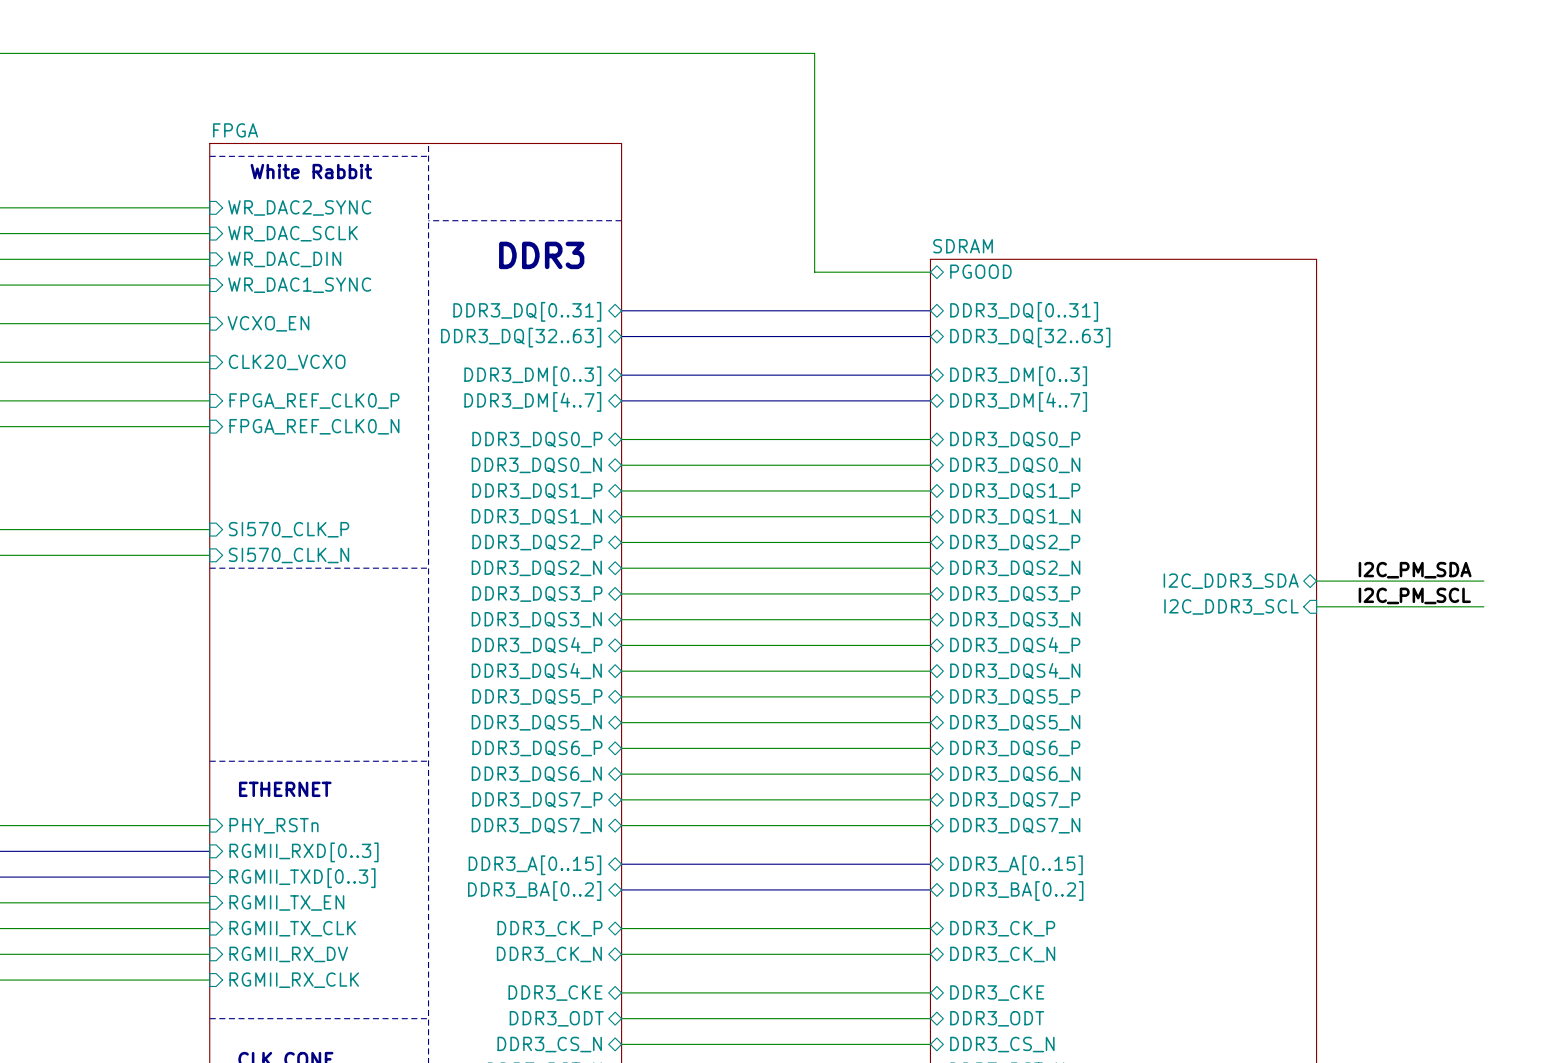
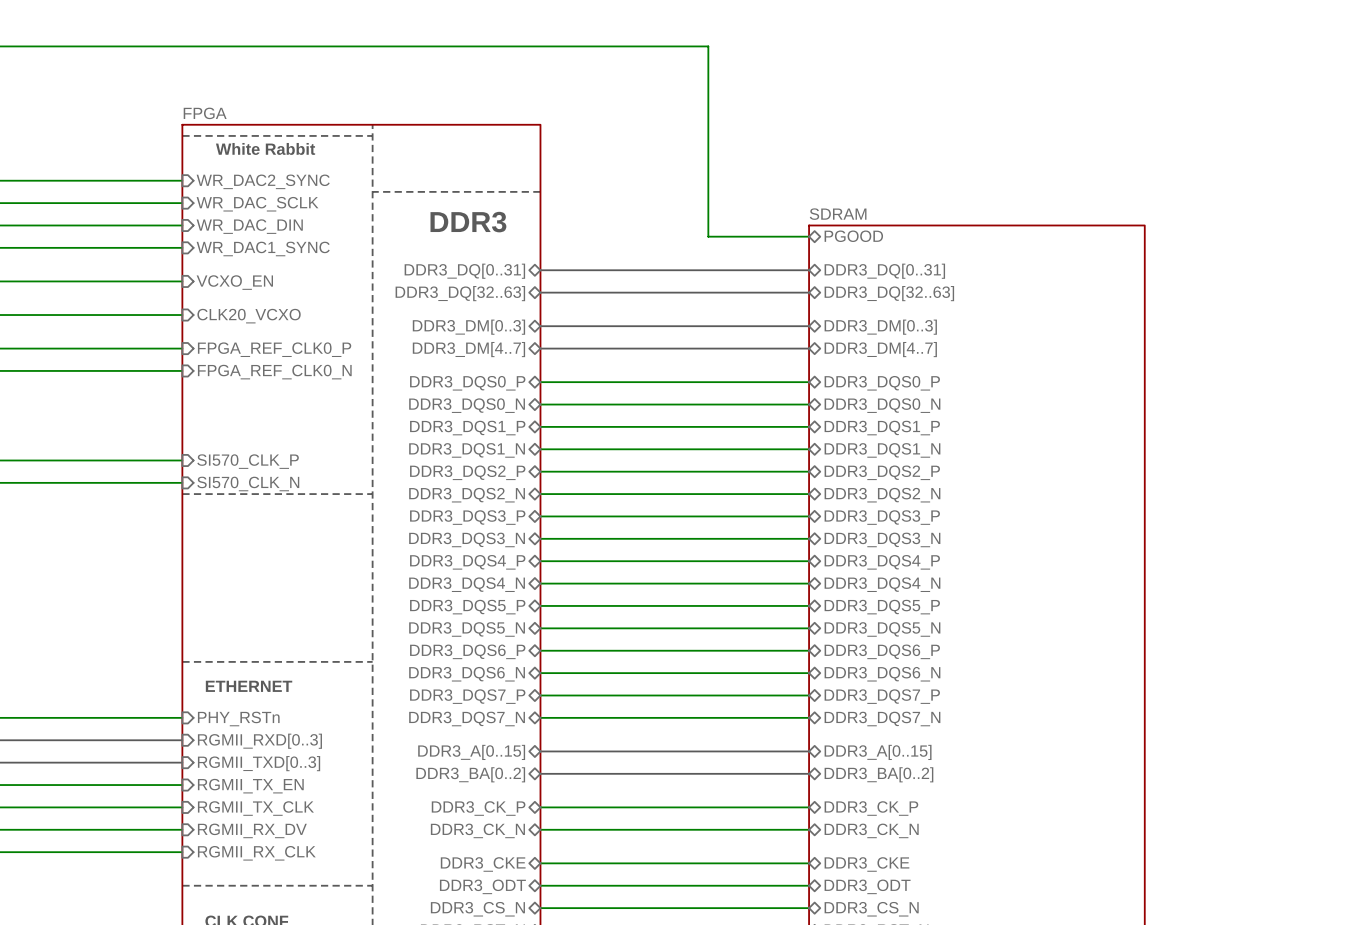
label: I2C_PM_SDA (1415, 570) -> none
sheet pin: I2C_DDR3_SDA (1231, 581) -> none
wire: (1316, 581) (1483, 581) -> none
label: I2C_PM_SCL (1414, 595) -> none
sheet pin: I2C_DDR3_SCL (1231, 606) -> none
wire: (1316, 606) (1483, 606) -> none

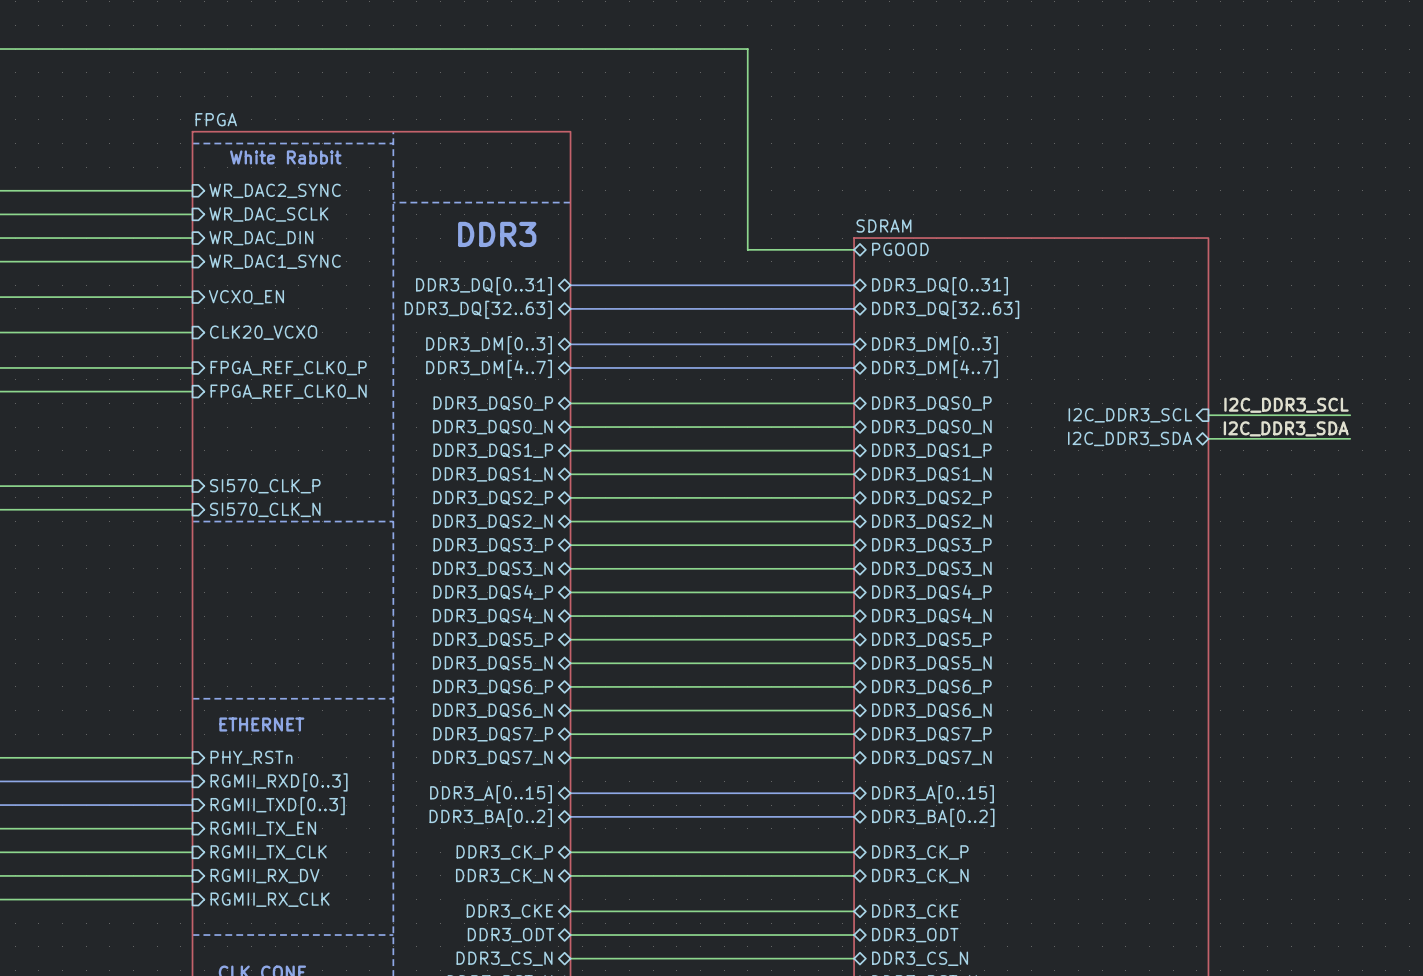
label: none -> I2C_DDR3_SCL (1286, 405)
wire: none -> (1208, 415) (1350, 415)
sheet pin: none -> I2C_DDR3_SCL (1130, 415)
label: none -> I2C_DDR3_SDA (1286, 428)
wire: none -> (1208, 438) (1350, 438)
sheet pin: none -> I2C_DDR3_SDA (1130, 438)

